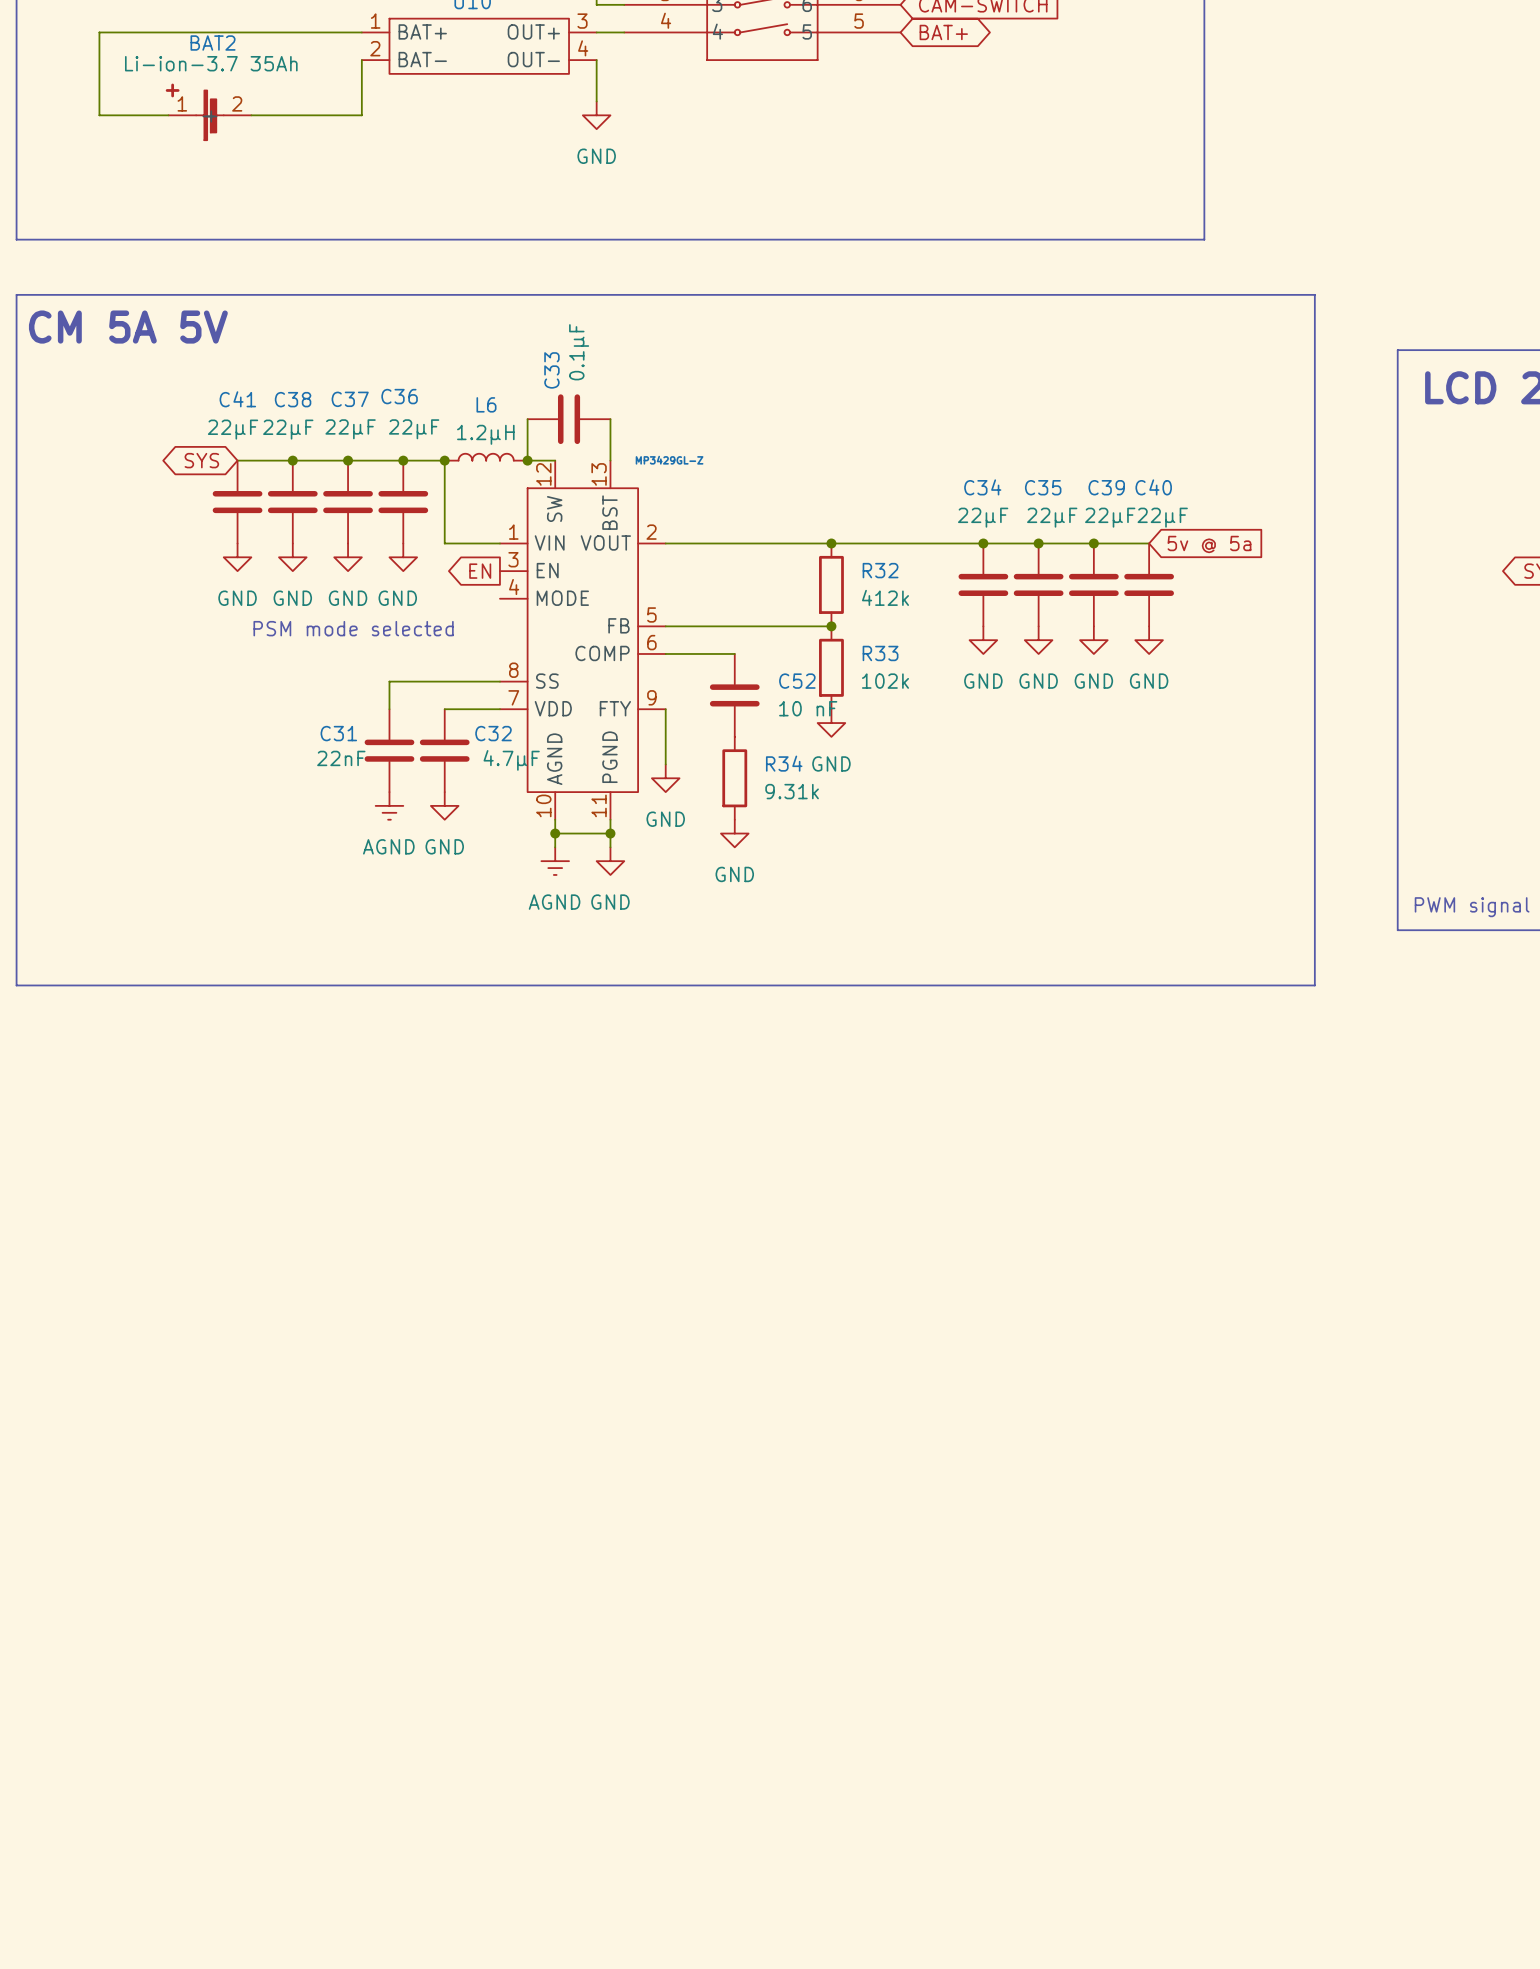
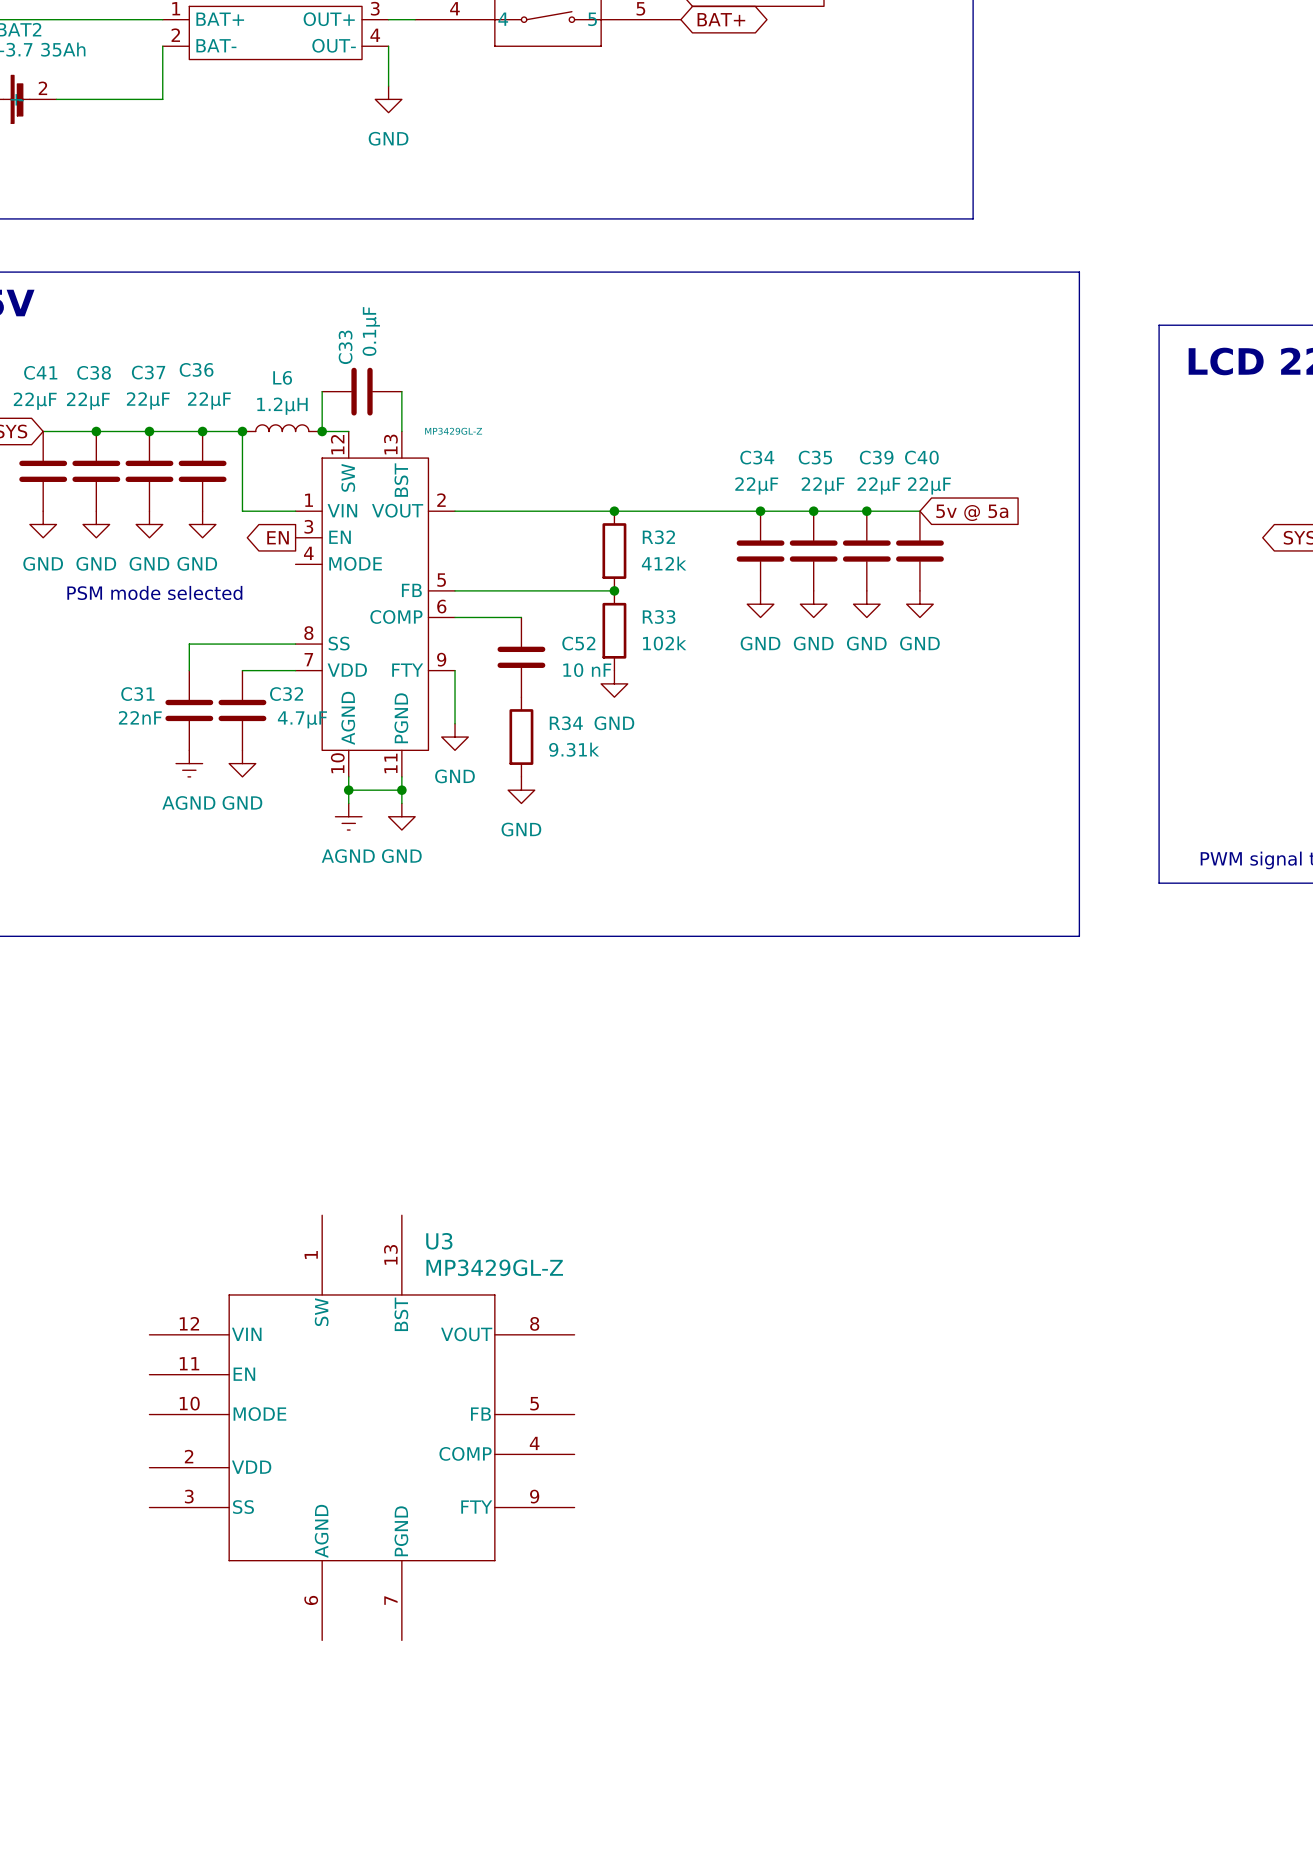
U3: none -> MP3429GL-Z (362, 1427)

